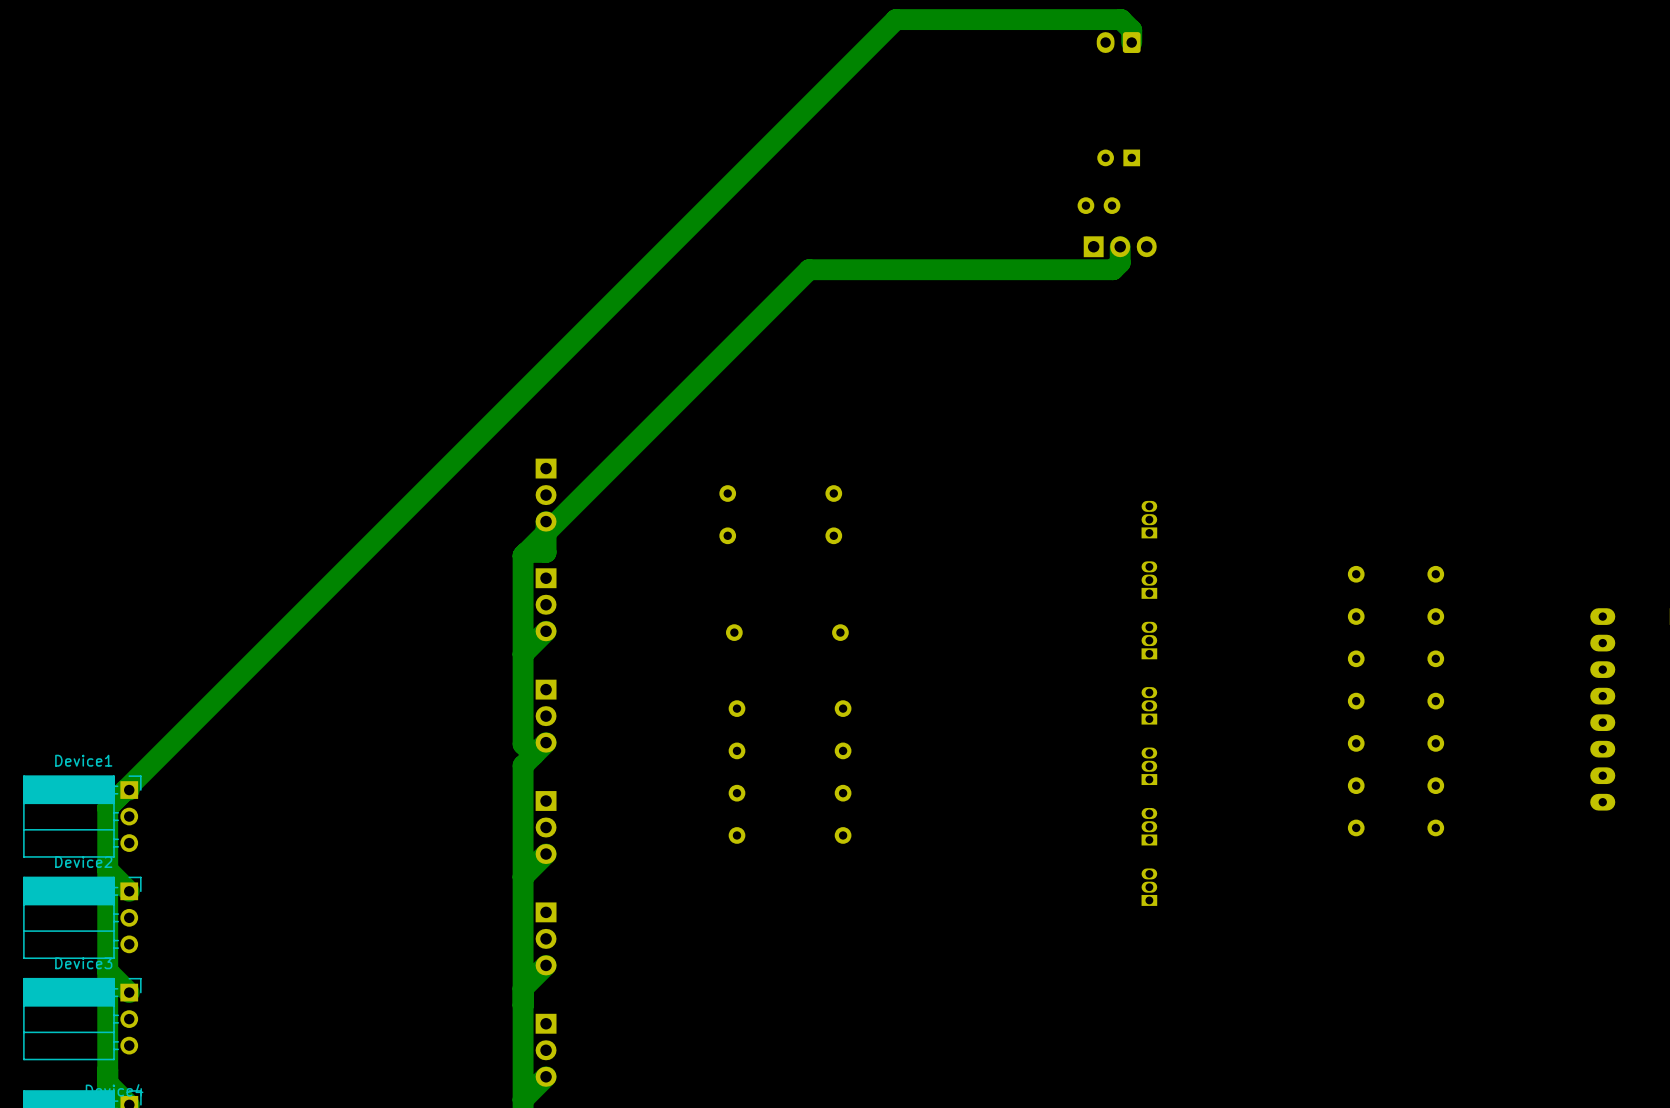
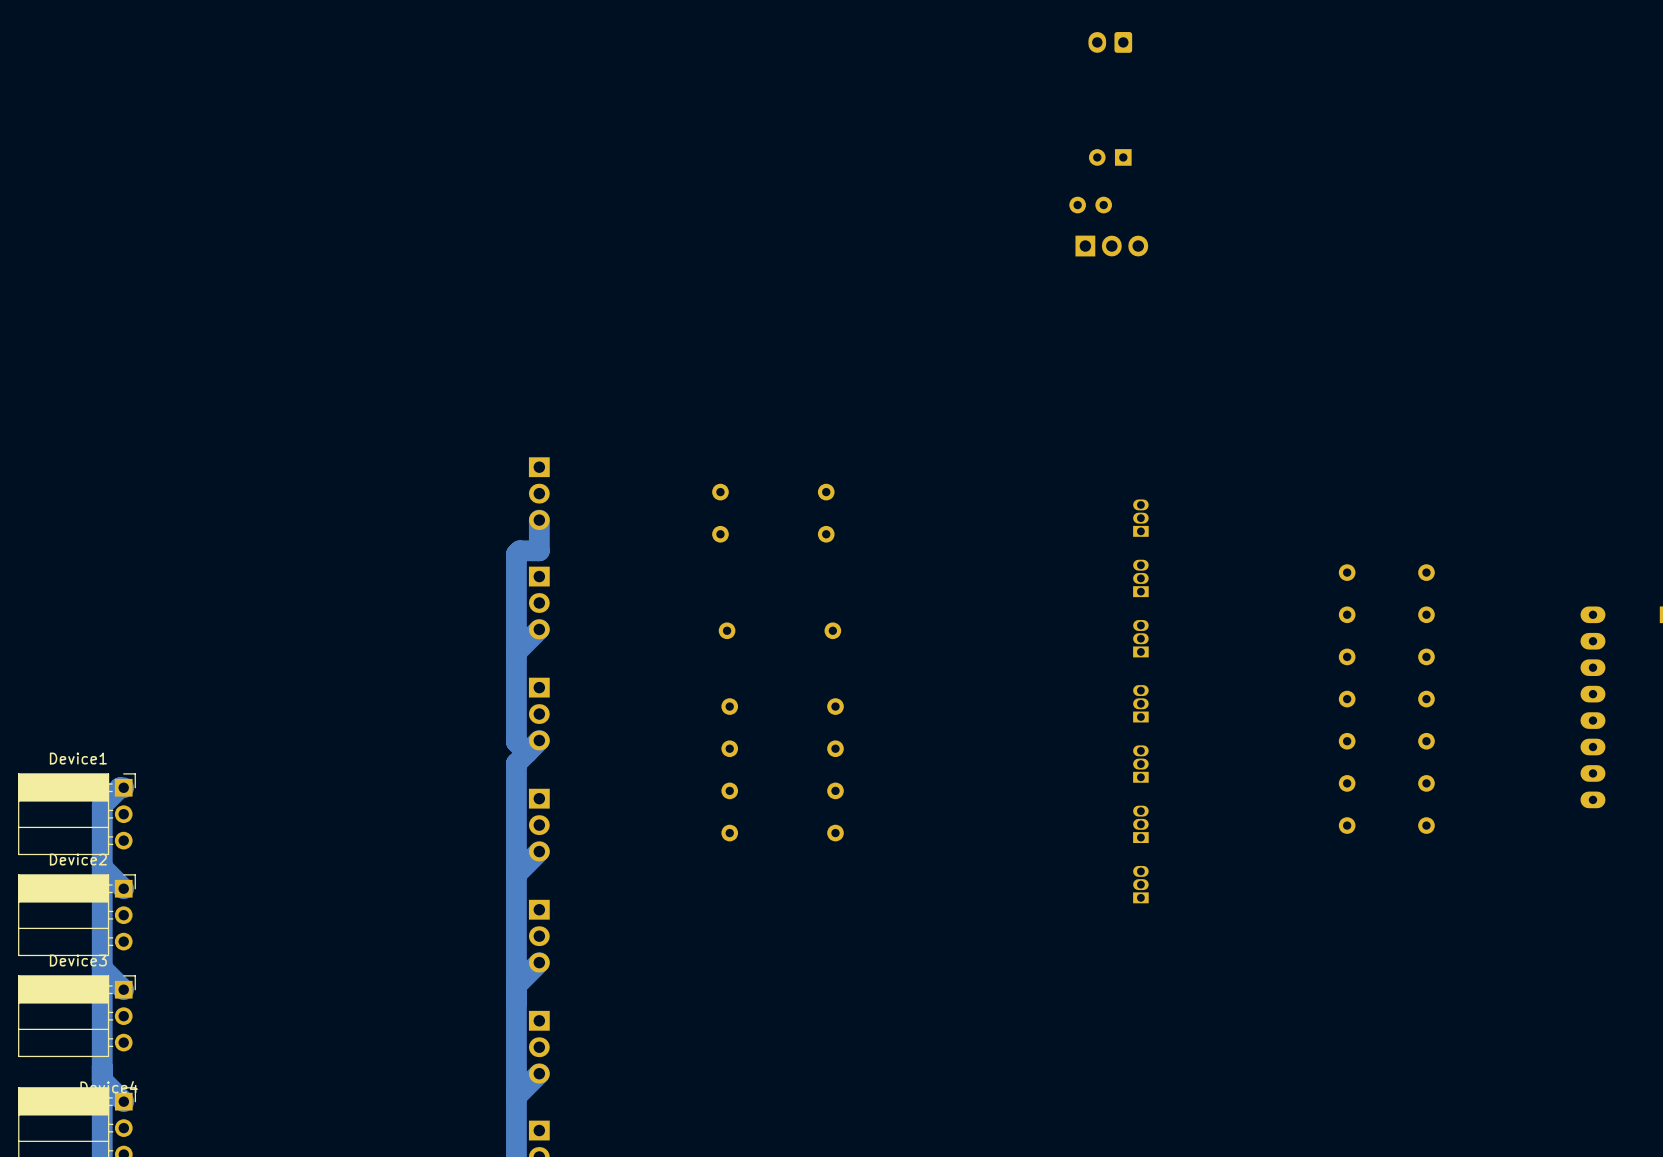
track: (1131, 42) (1131, 30) (1121, 19) (895, 19) (125, 790) -> none
track: (1120, 246) (1120, 262) (1113, 269) (809, 269) (526, 552) -> none

